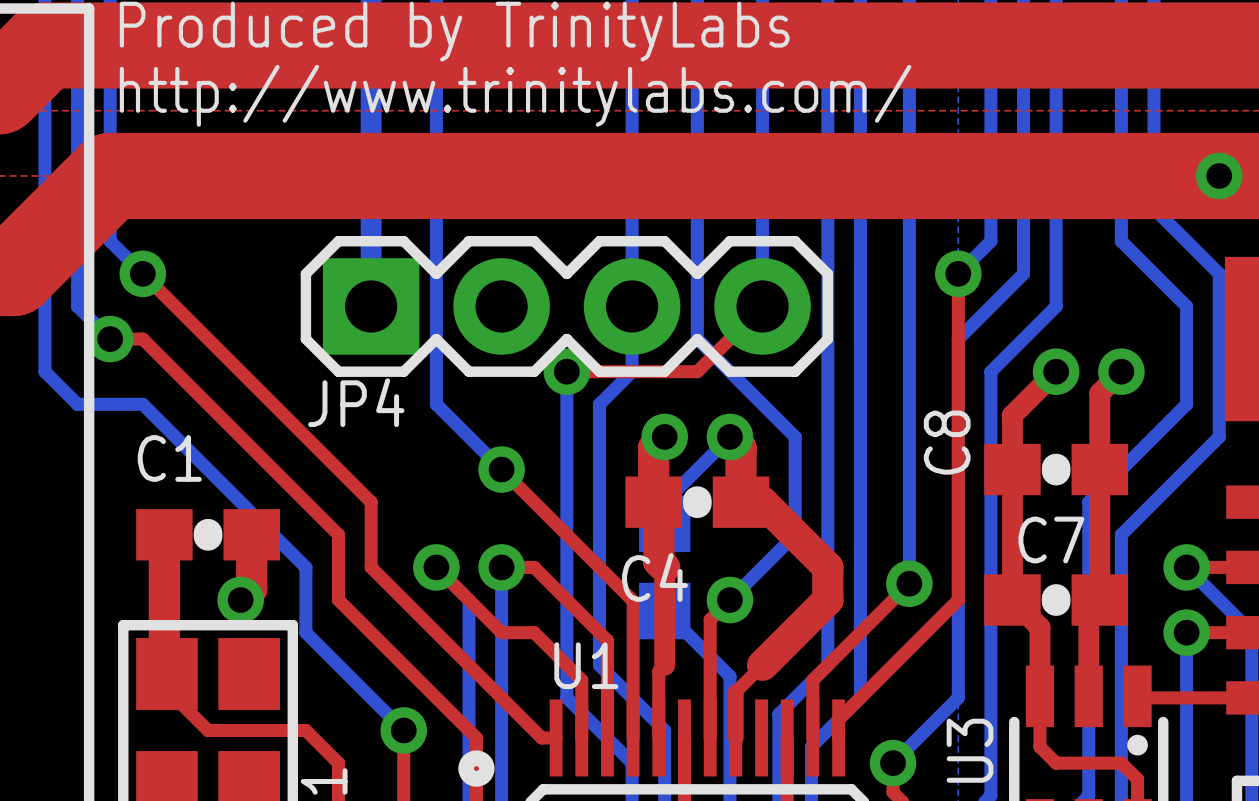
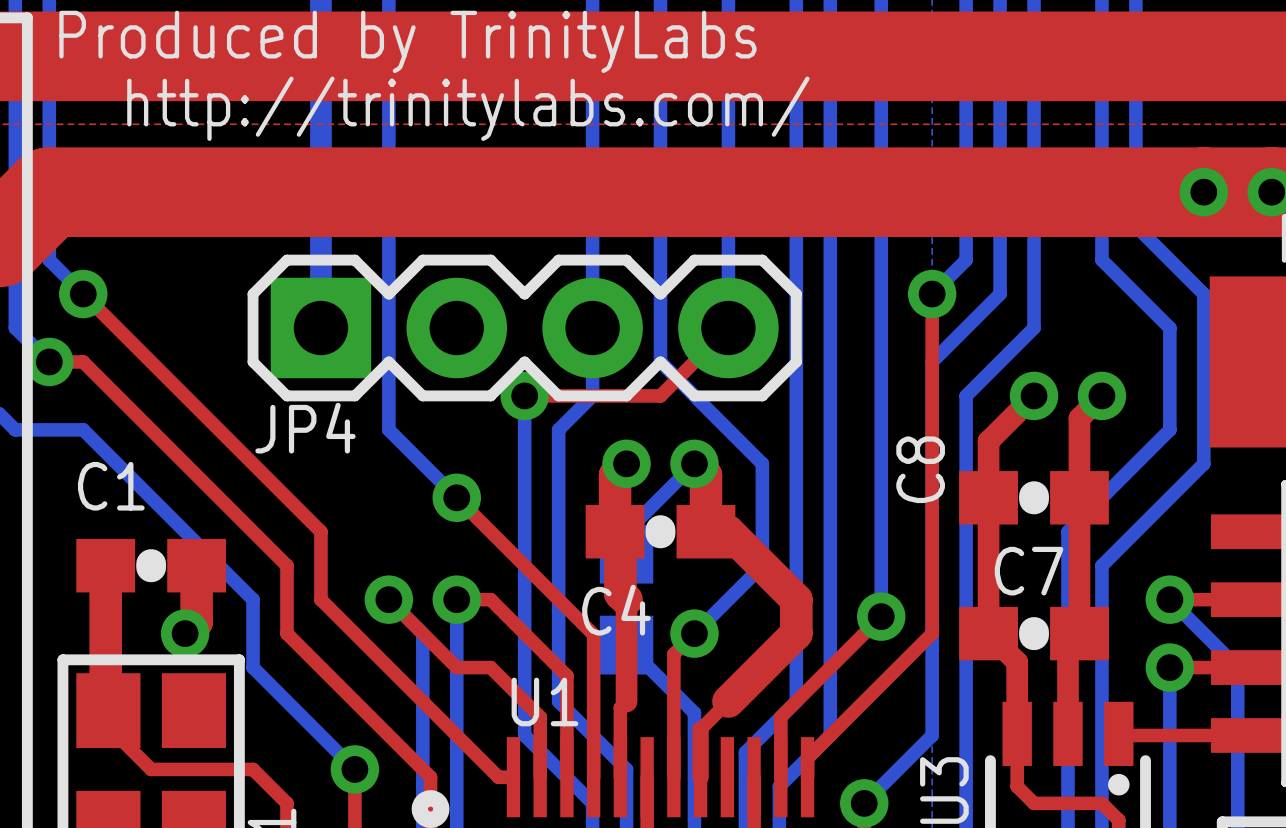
text: http://www.trinitylabs.com/ (515, 95) -> http://trinitylabs.com/ (468, 108)

